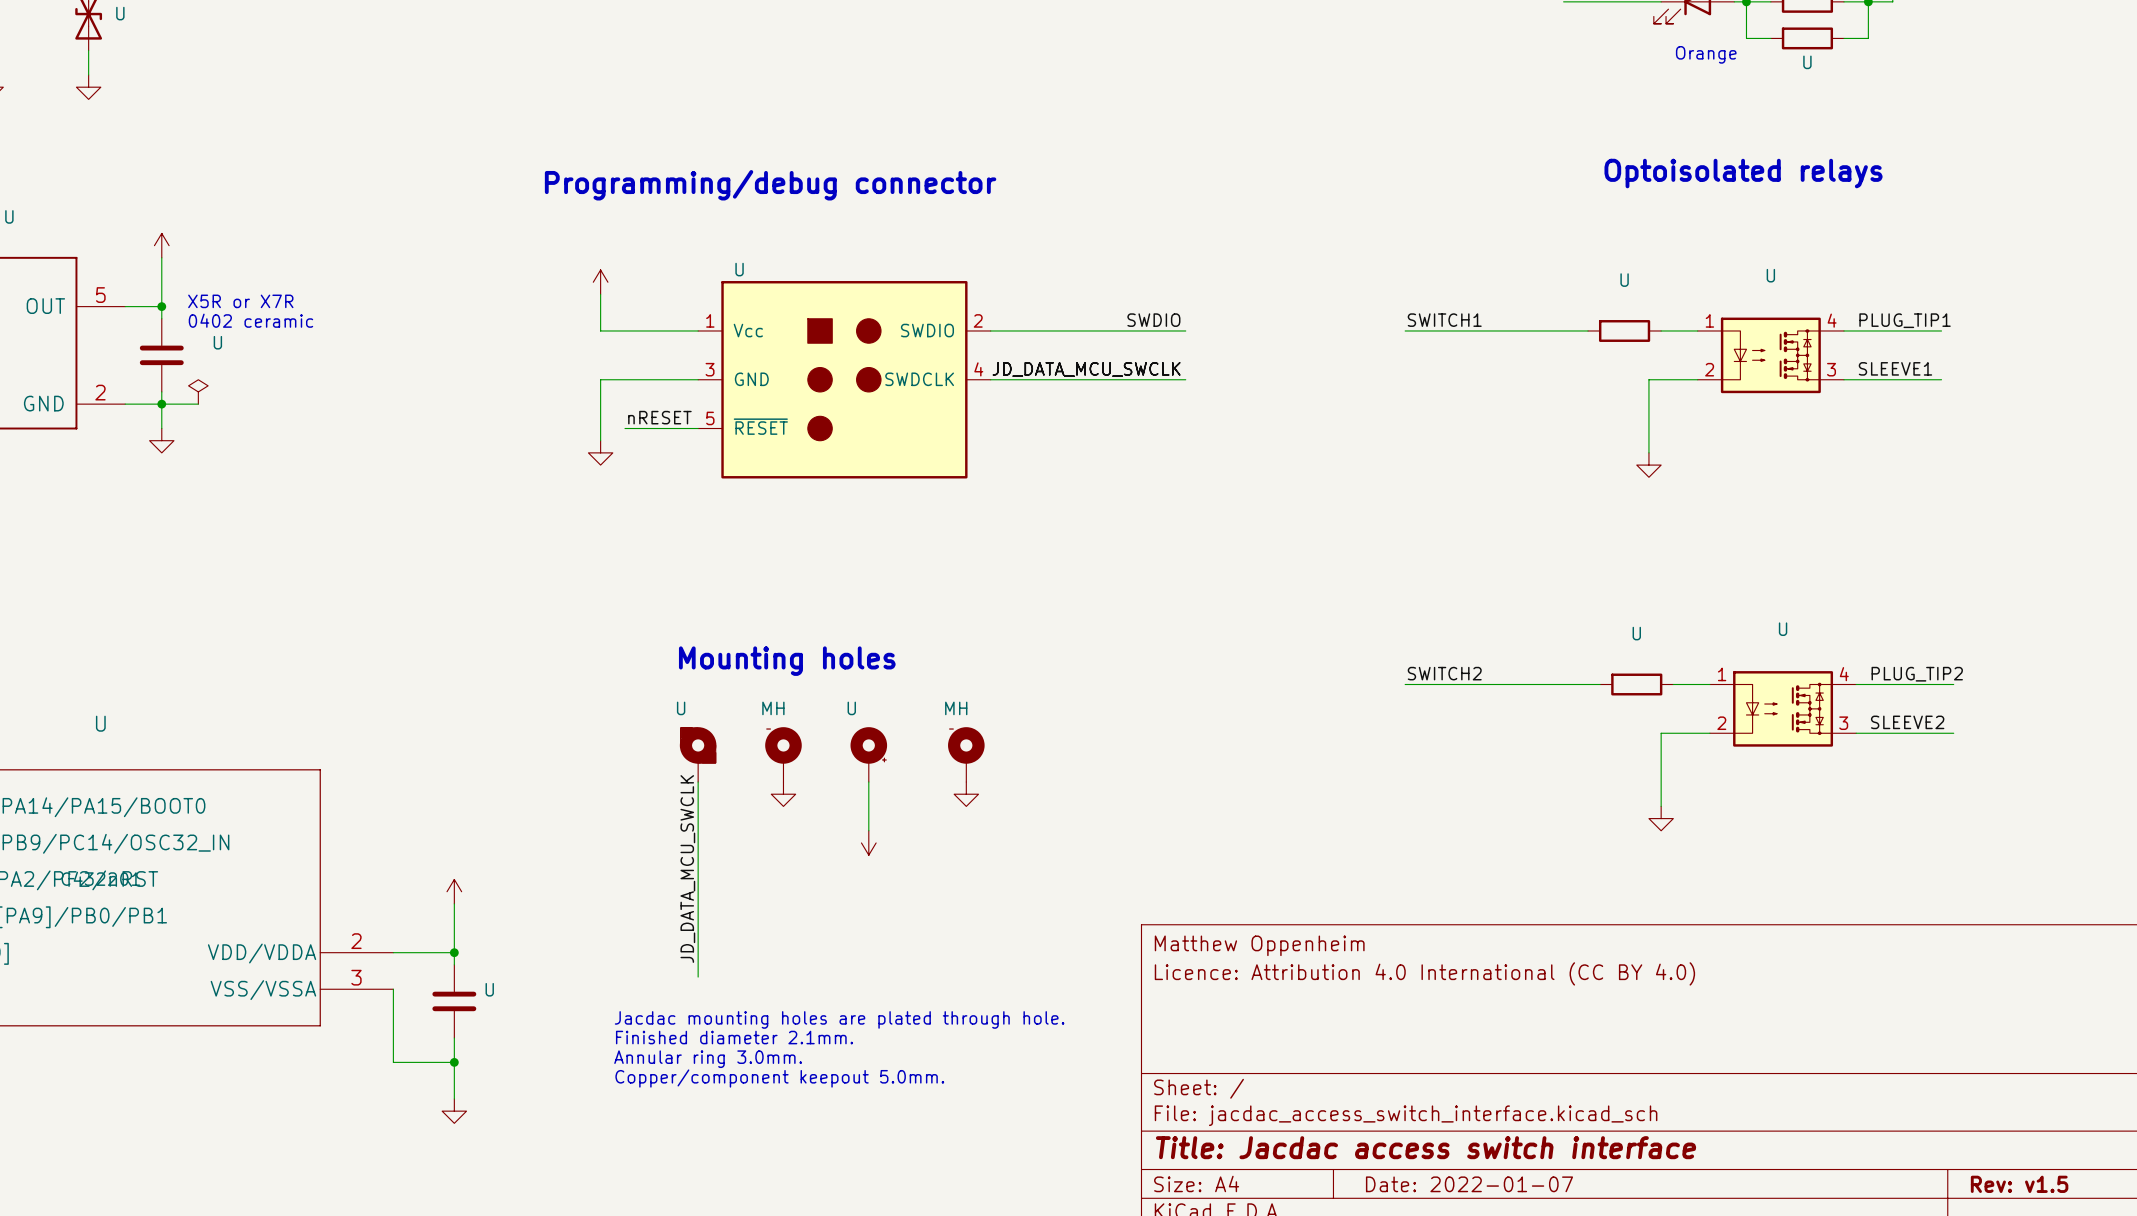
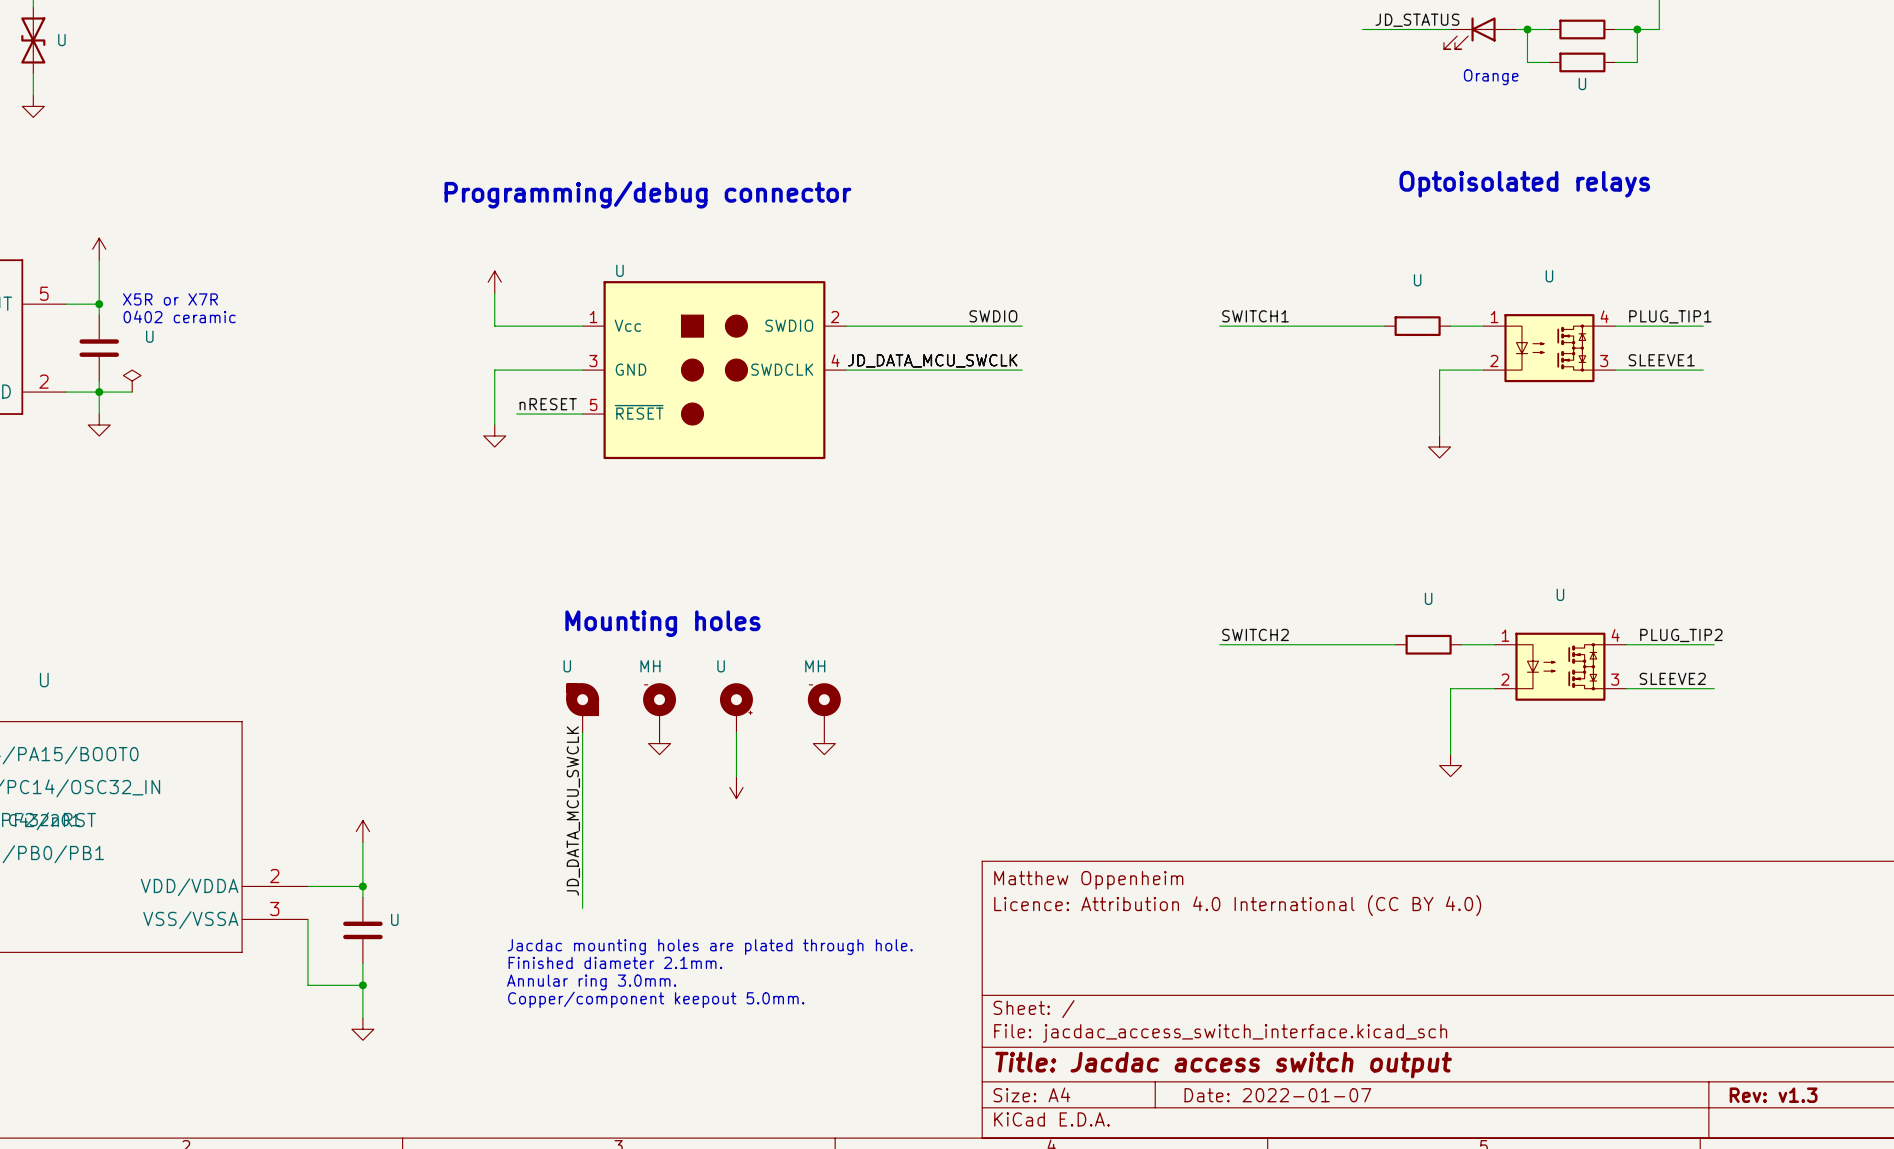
title block: Title: Jacdac access switch interface (1426, 1147) -> Title: Jacdac access switch output (1223, 1065)
title block: Rev: v1.5 (2019, 1184) -> Rev: v1.3 (1773, 1095)

